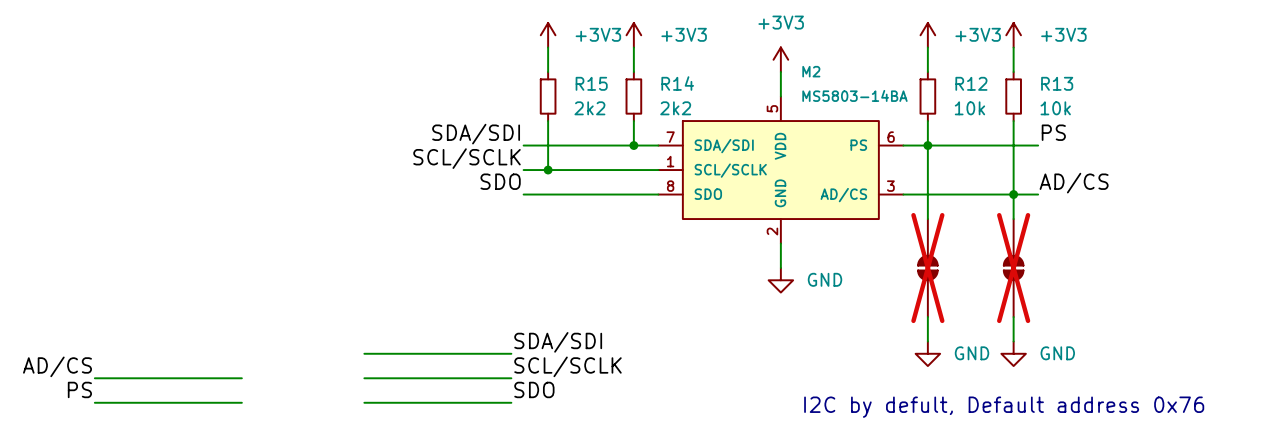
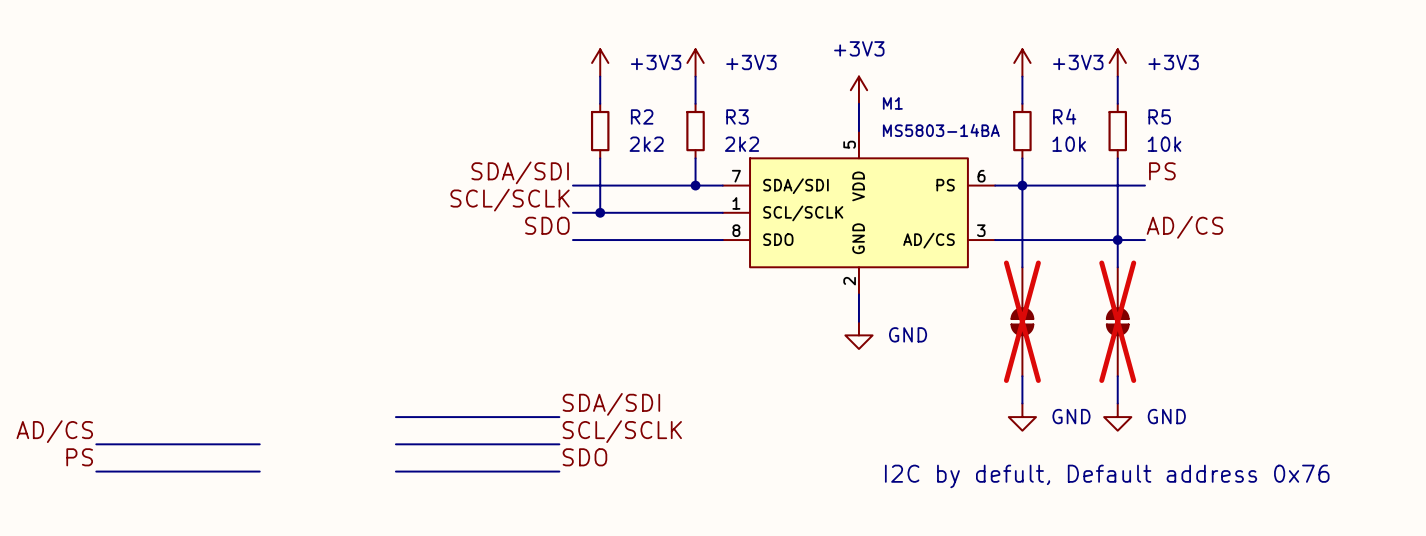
M2 name: M2 (811, 71) -> M1 (892, 103)
R15 name: R15 (591, 83) -> R2 (642, 116)
R14 name: R14 (677, 83) -> R3 (737, 116)
R12 name: R12 (971, 83) -> R4 (1064, 116)
R13 name: R13 (1057, 83) -> R5 (1159, 116)

